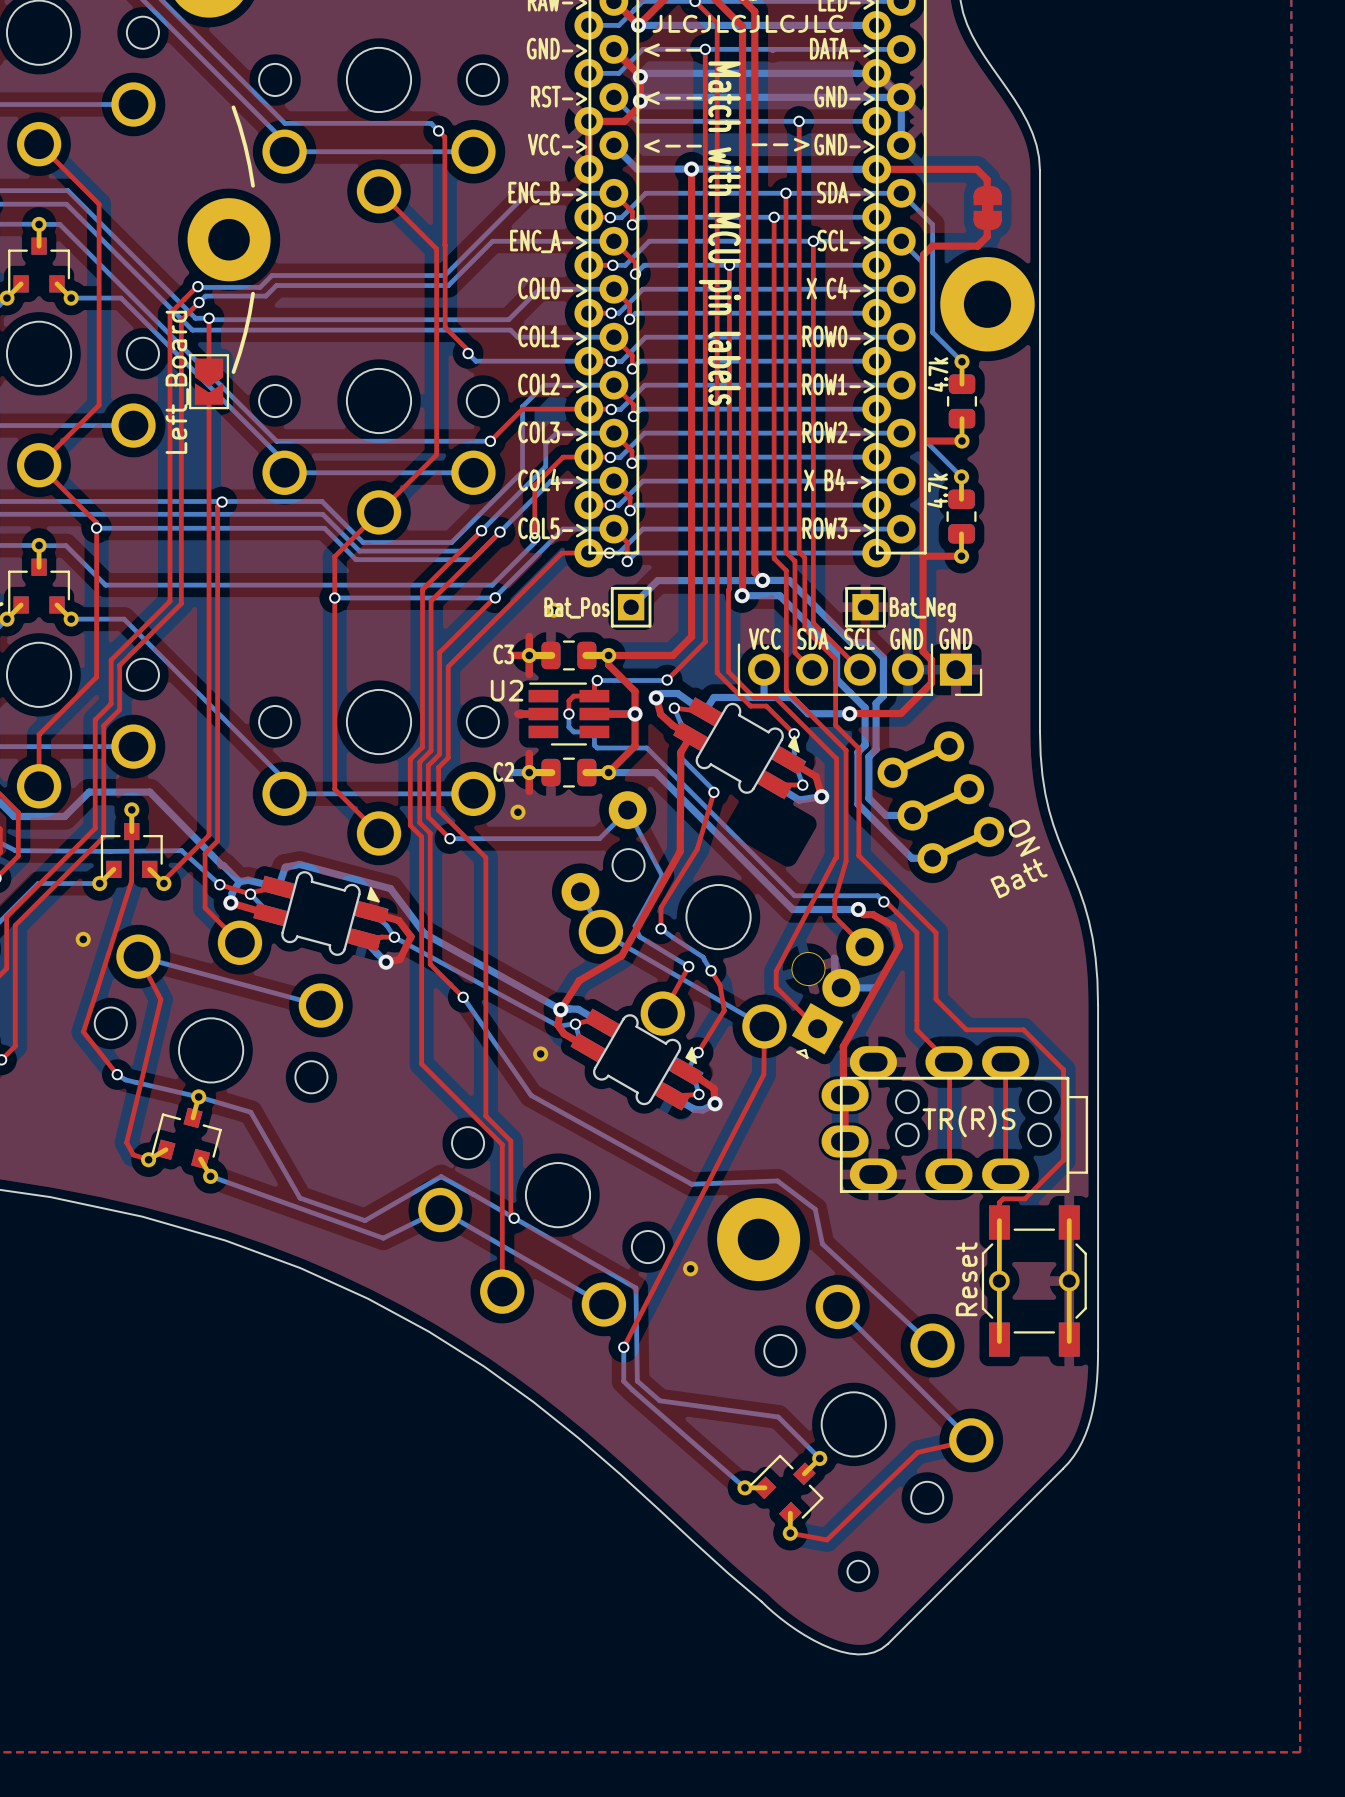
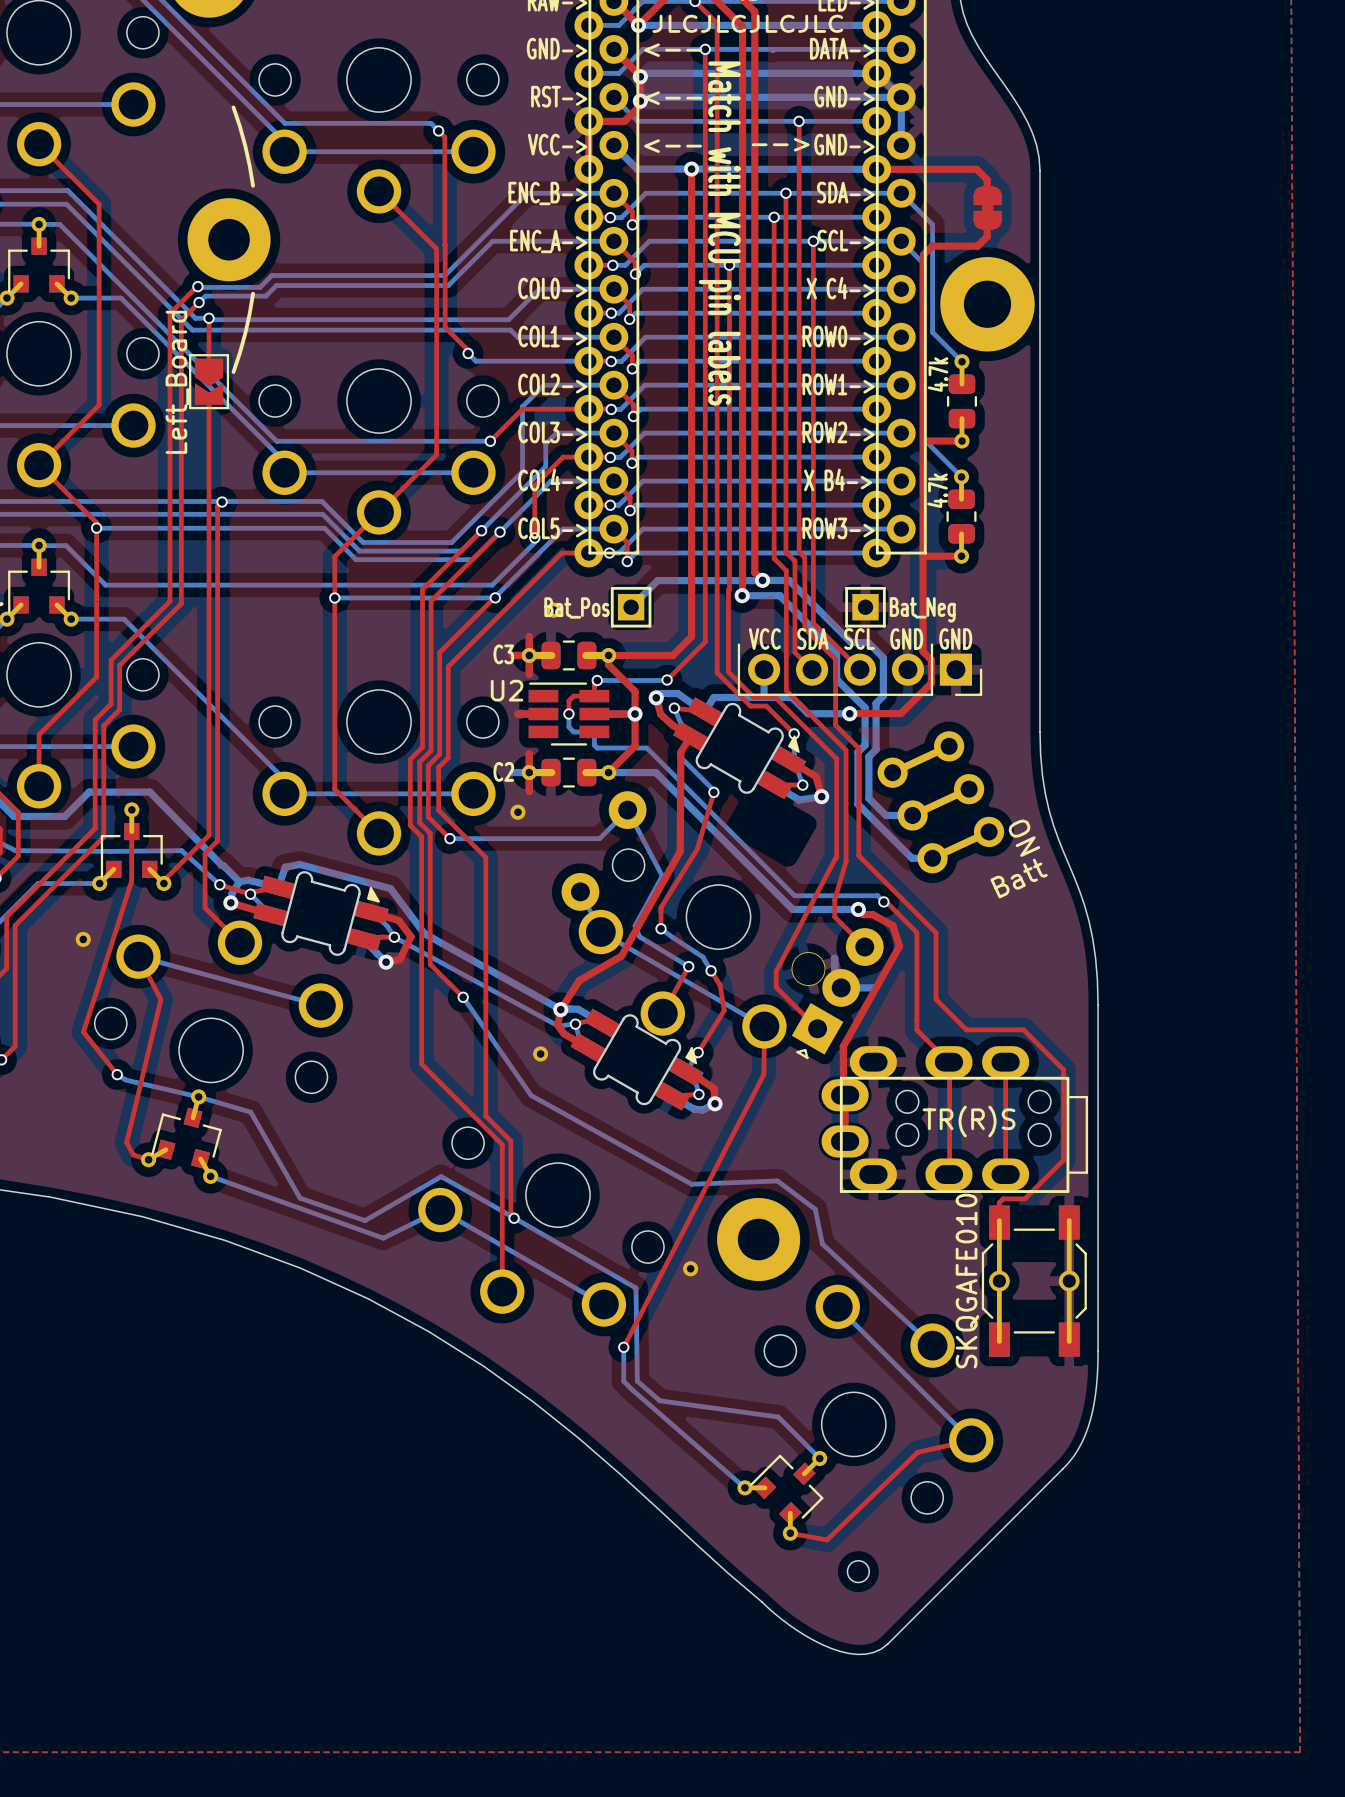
part text: Reset (966, 1279) -> none
part value: none -> SKQGAFE010 (967, 1281)

